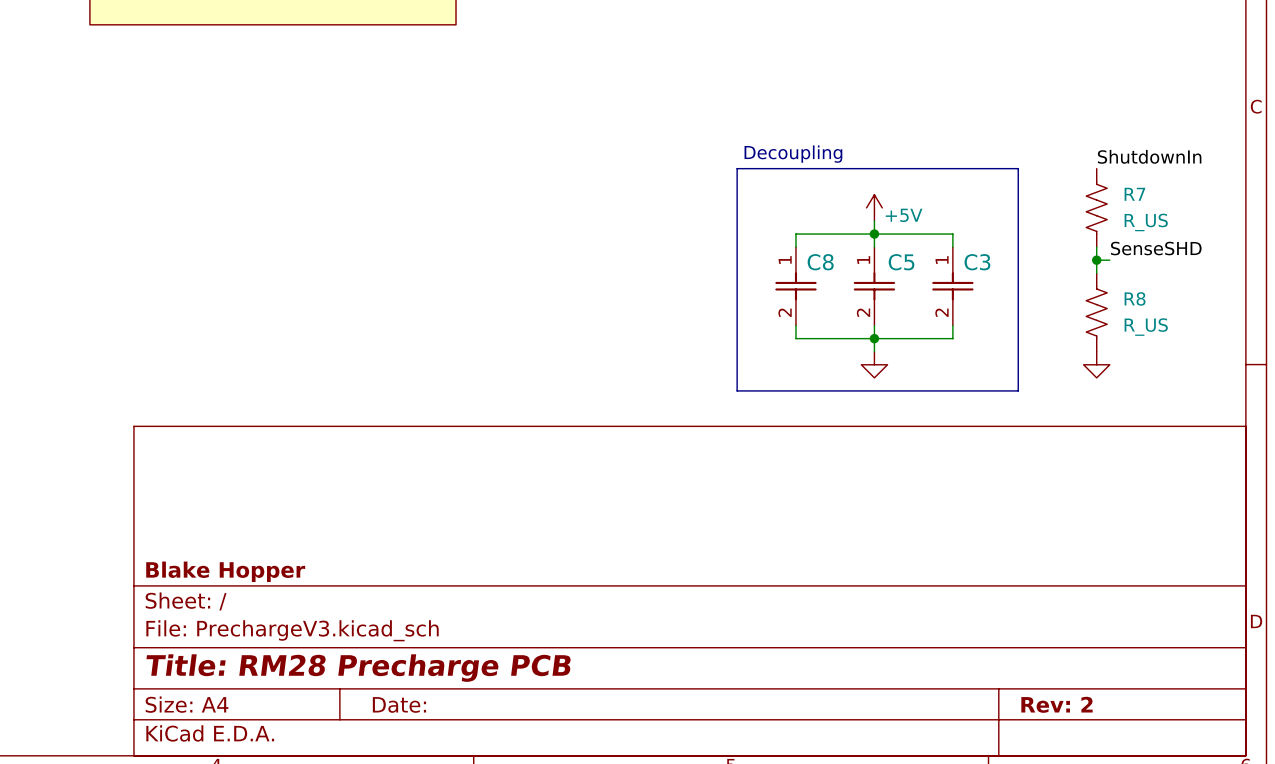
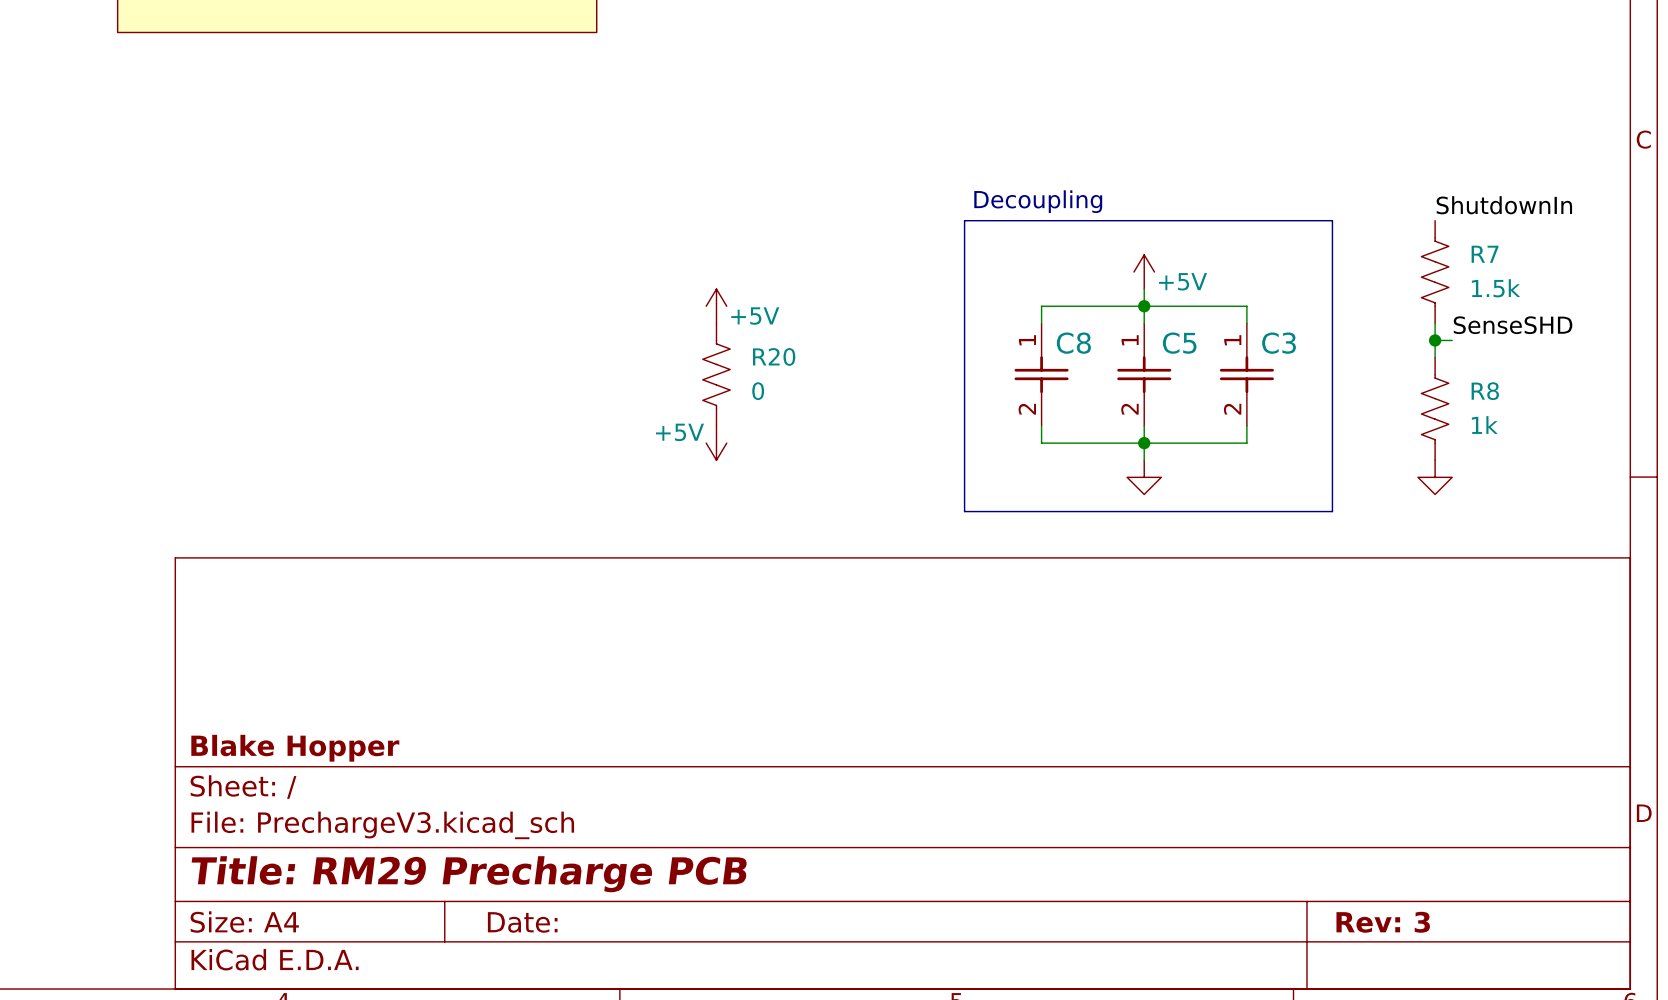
R7 value: R_US (1146, 222) -> 1.5k (1496, 288)
power symbol: none -> +5V (716, 306)
R20: none -> 0 (716, 374)
R8 value: R_US (1146, 327) -> 1k (1484, 425)
power symbol: none -> +5V (716, 443)
title block: Title: RM28 Precharge PCB (358, 668) -> Title: RM29 Precharge PCB (469, 874)
title block: Rev: 2 (1056, 704) -> Rev: 3 (1383, 922)

